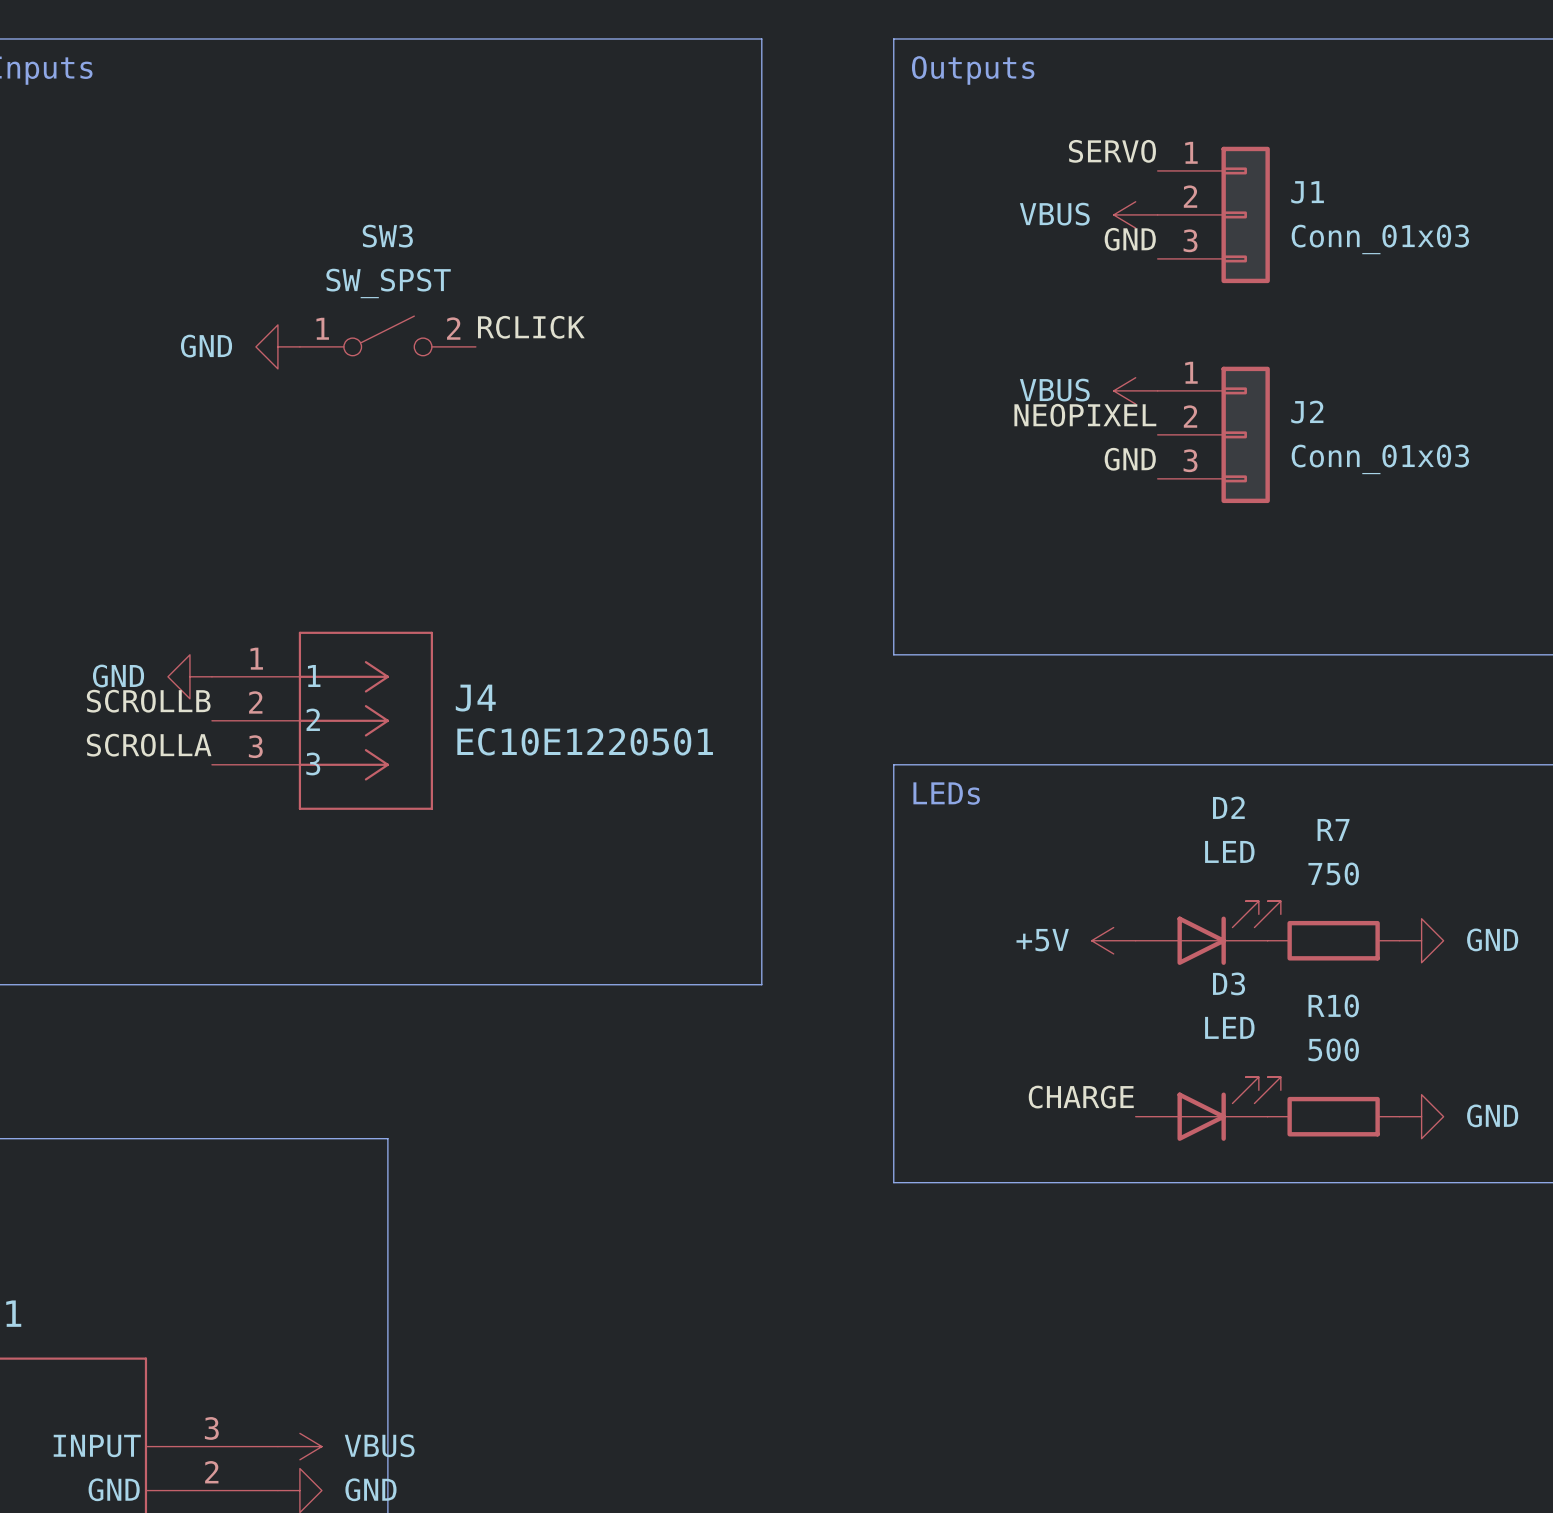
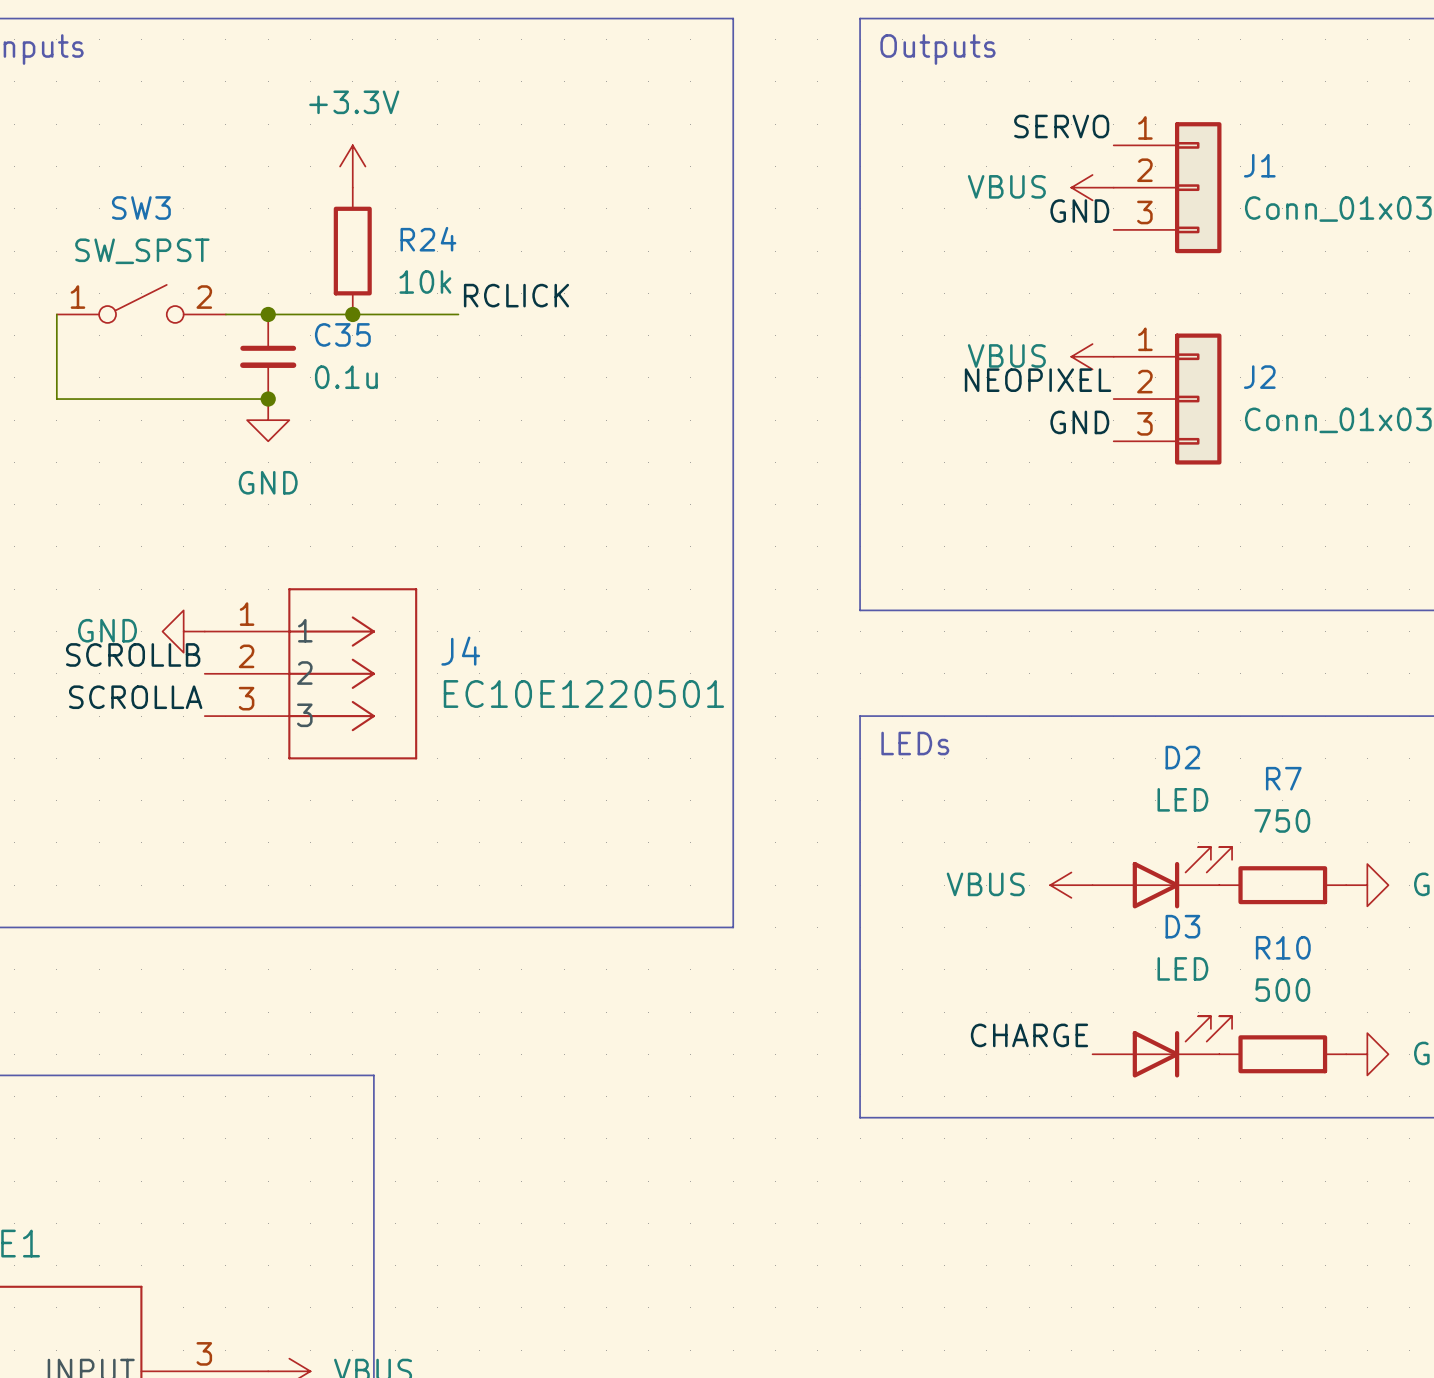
power symbol: none -> +3.3V (352, 166)
R24: none -> 10k (352, 251)
SW3 position: (387, 335) -> (141, 303)
wire: none -> (56, 314) (56, 399) (268, 399)
wire: none -> (225, 314) (458, 314)
power symbol rotation: 0° (277, 346) -> 90° counterclockwise (268, 420)
power symbol position: GND (277, 346) -> GND (268, 420)
junction: none -> (268, 314)
junction: none -> (352, 314)
C35: none -> 0.1u (268, 356)
junction: none -> (268, 399)
power symbol: +5V (1113, 940) -> VBUS (1071, 885)

